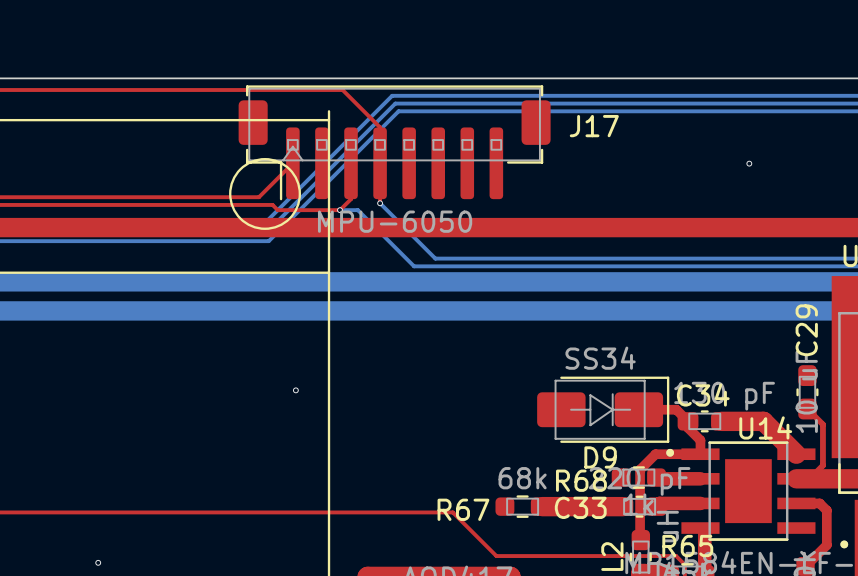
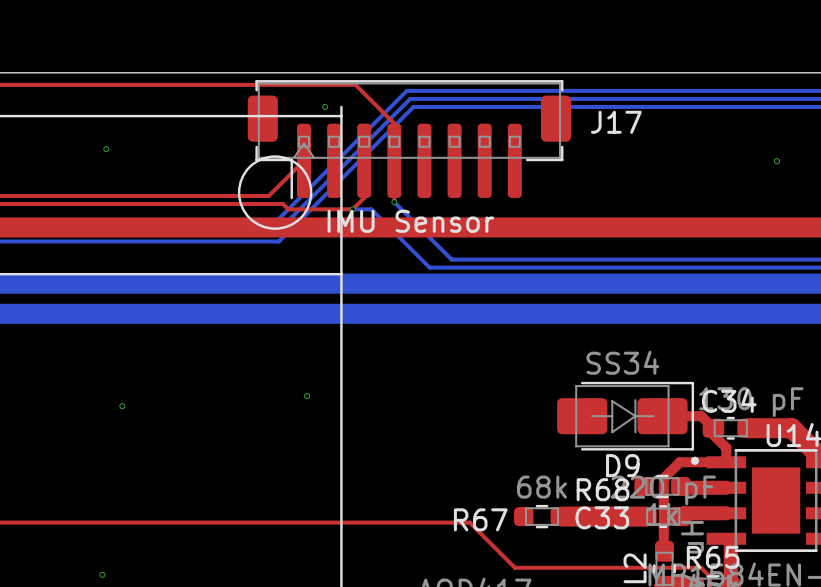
via: none -> (325, 106)
via: none -> (106, 149)
J17 value: MPU-6050 (395, 221) -> IMU Sensor (410, 221)
via: none -> (122, 406)

